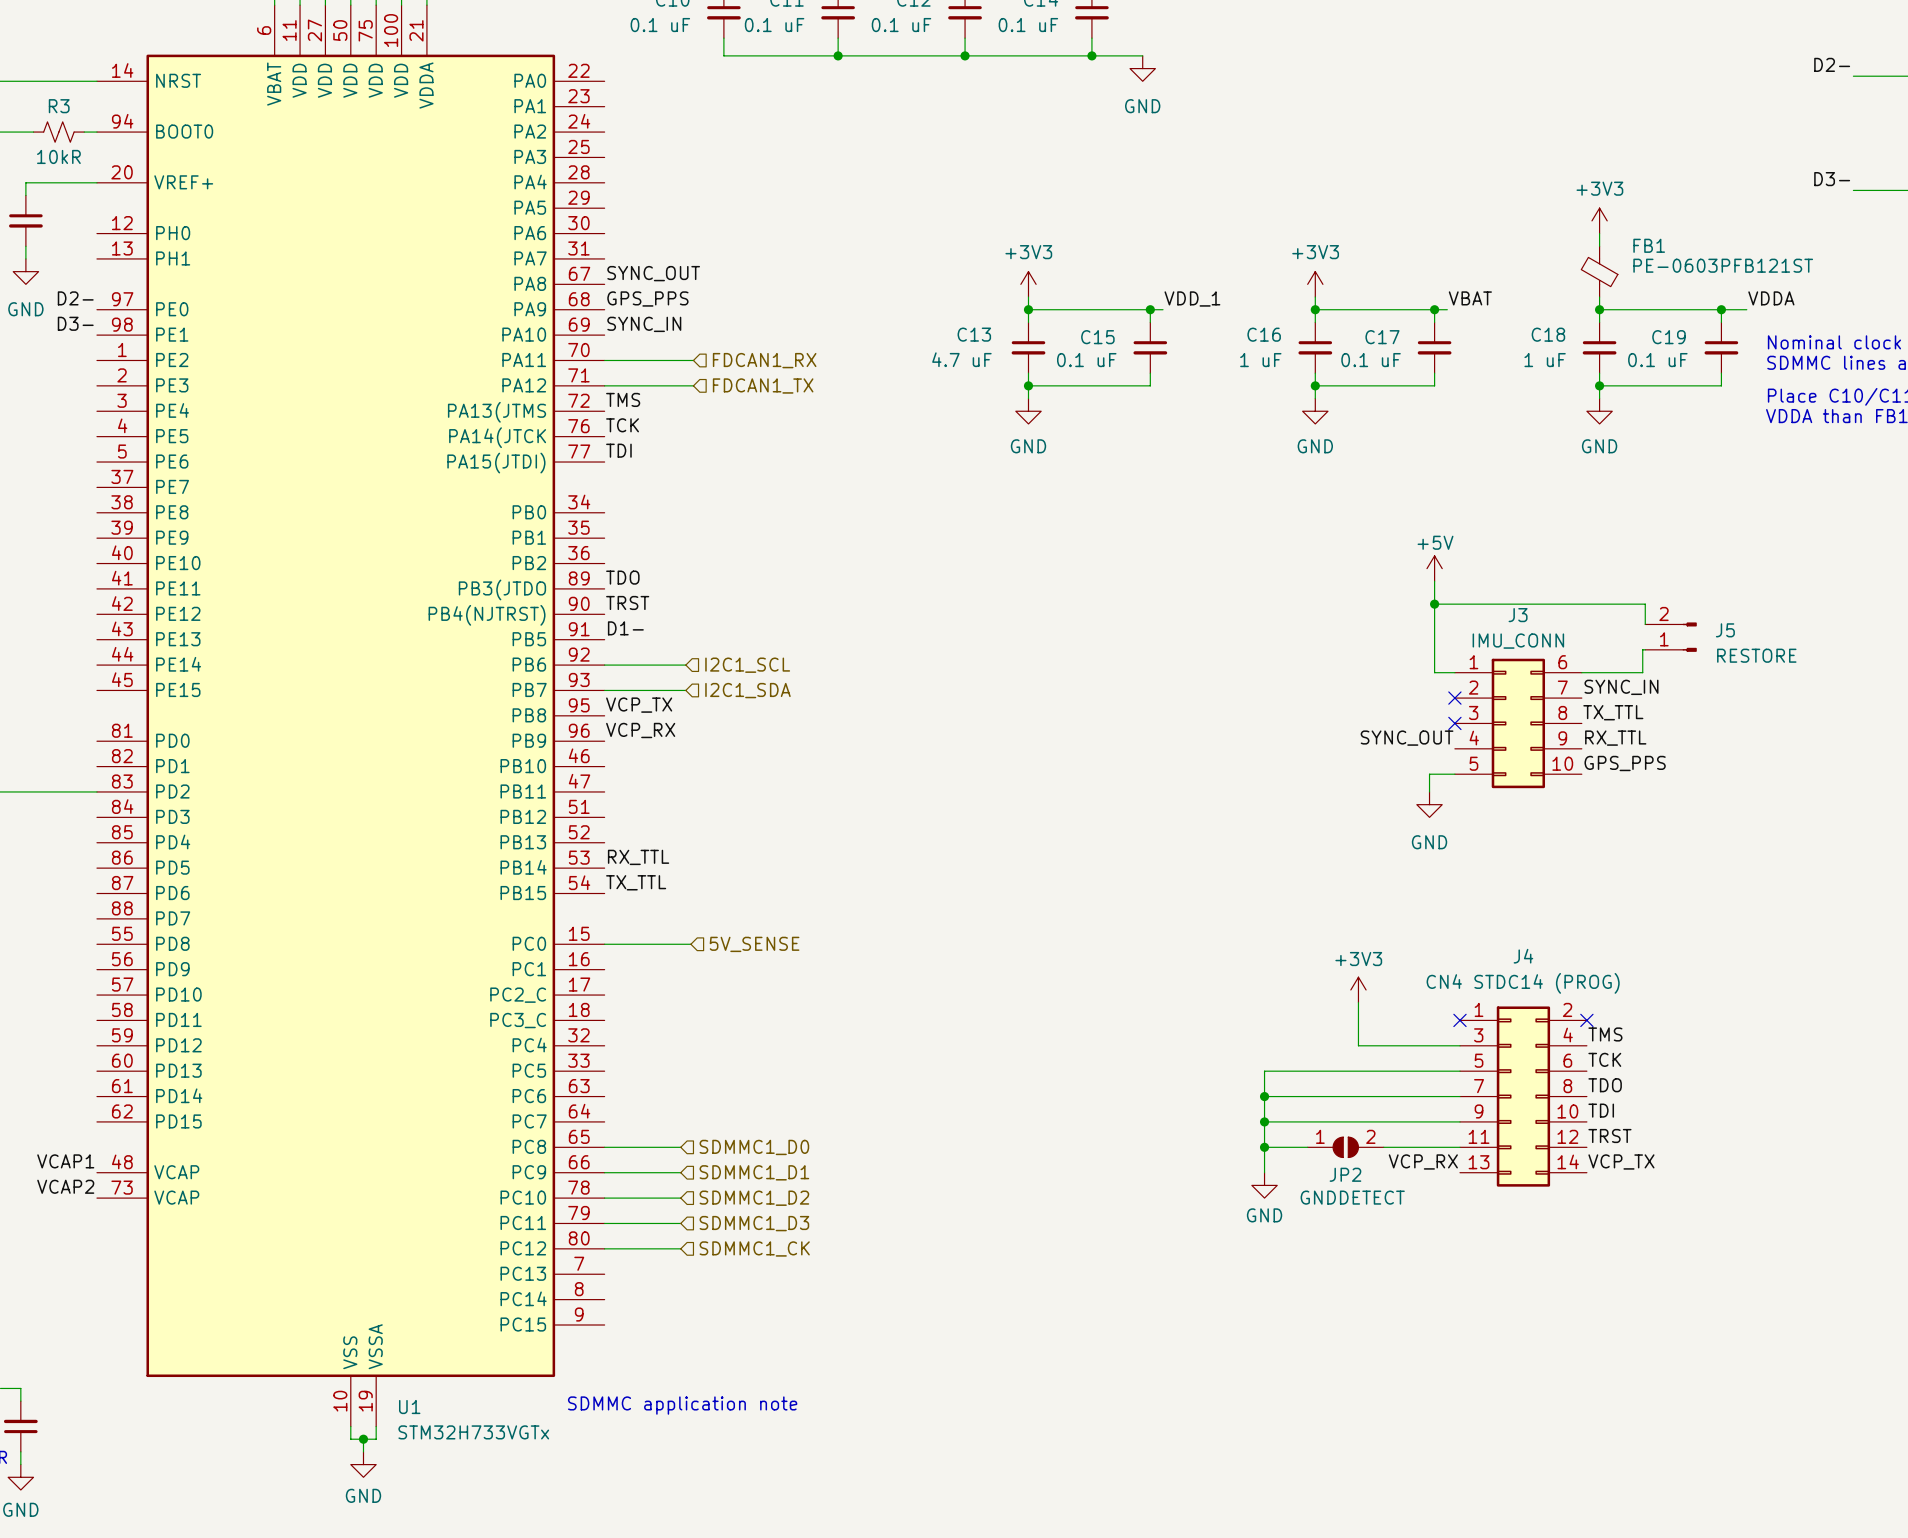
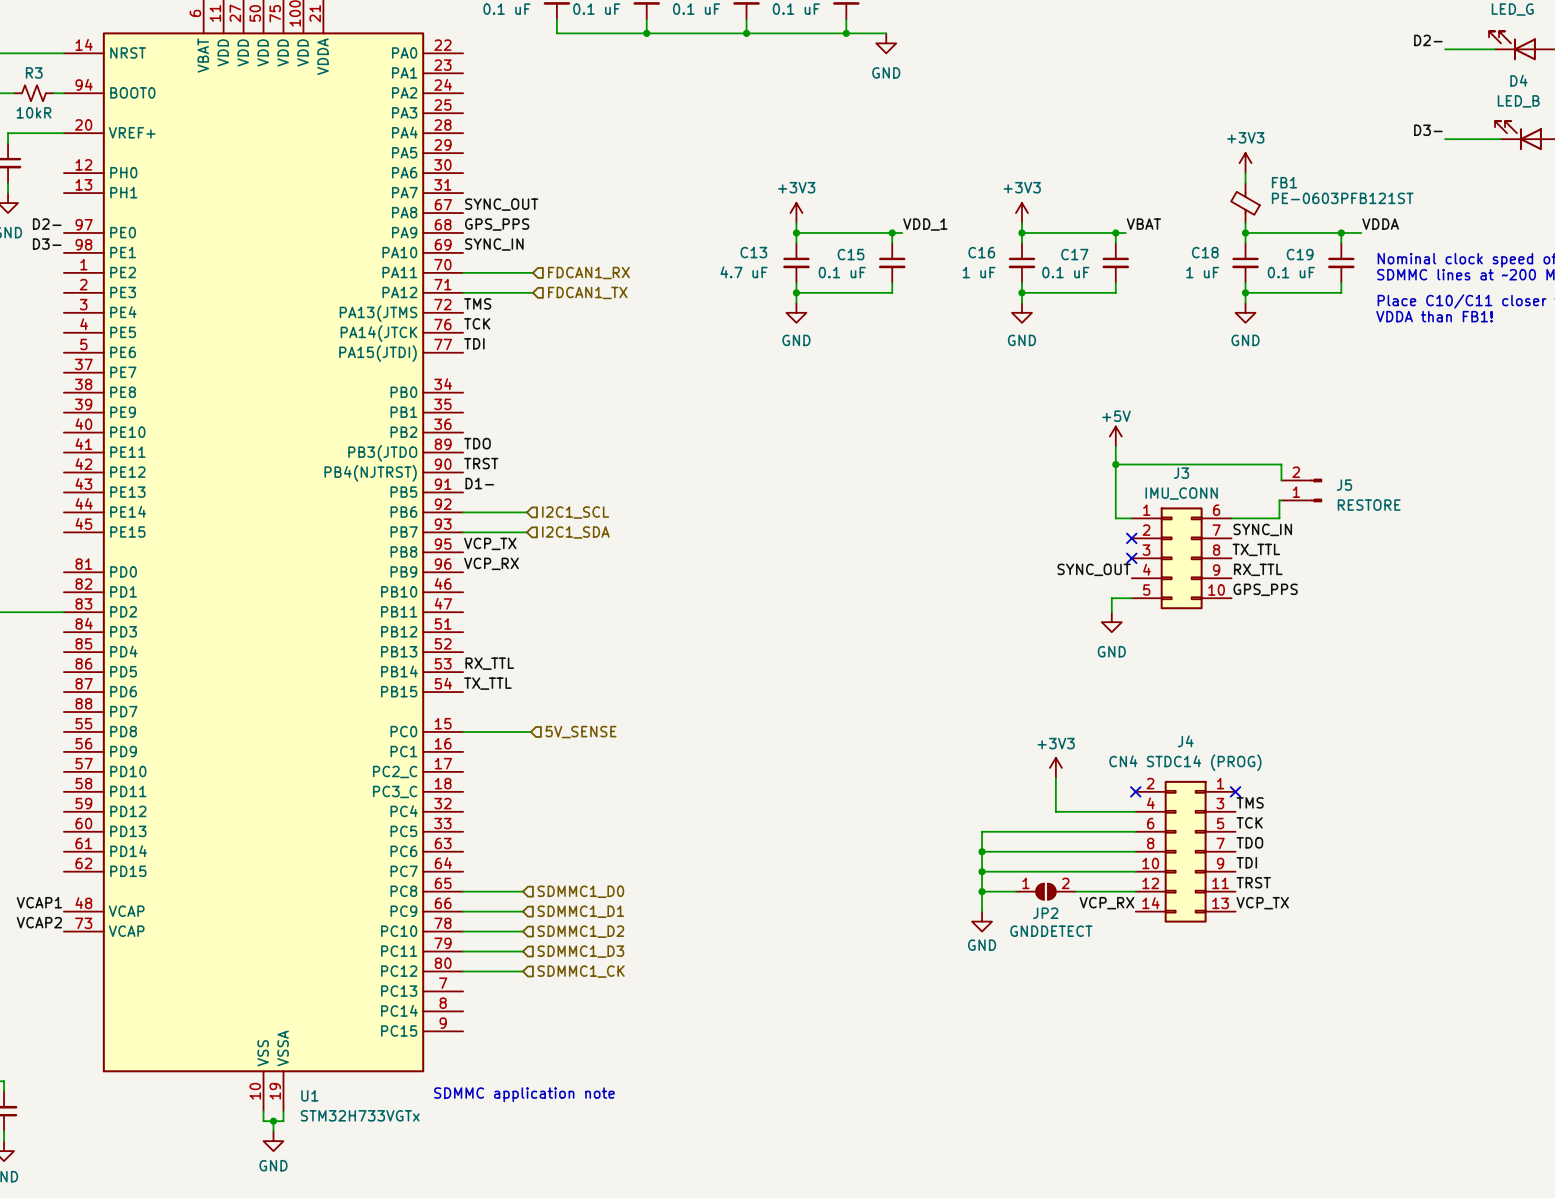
J4 flip: as is (1523, 1096) -> left-right (1185, 851)

